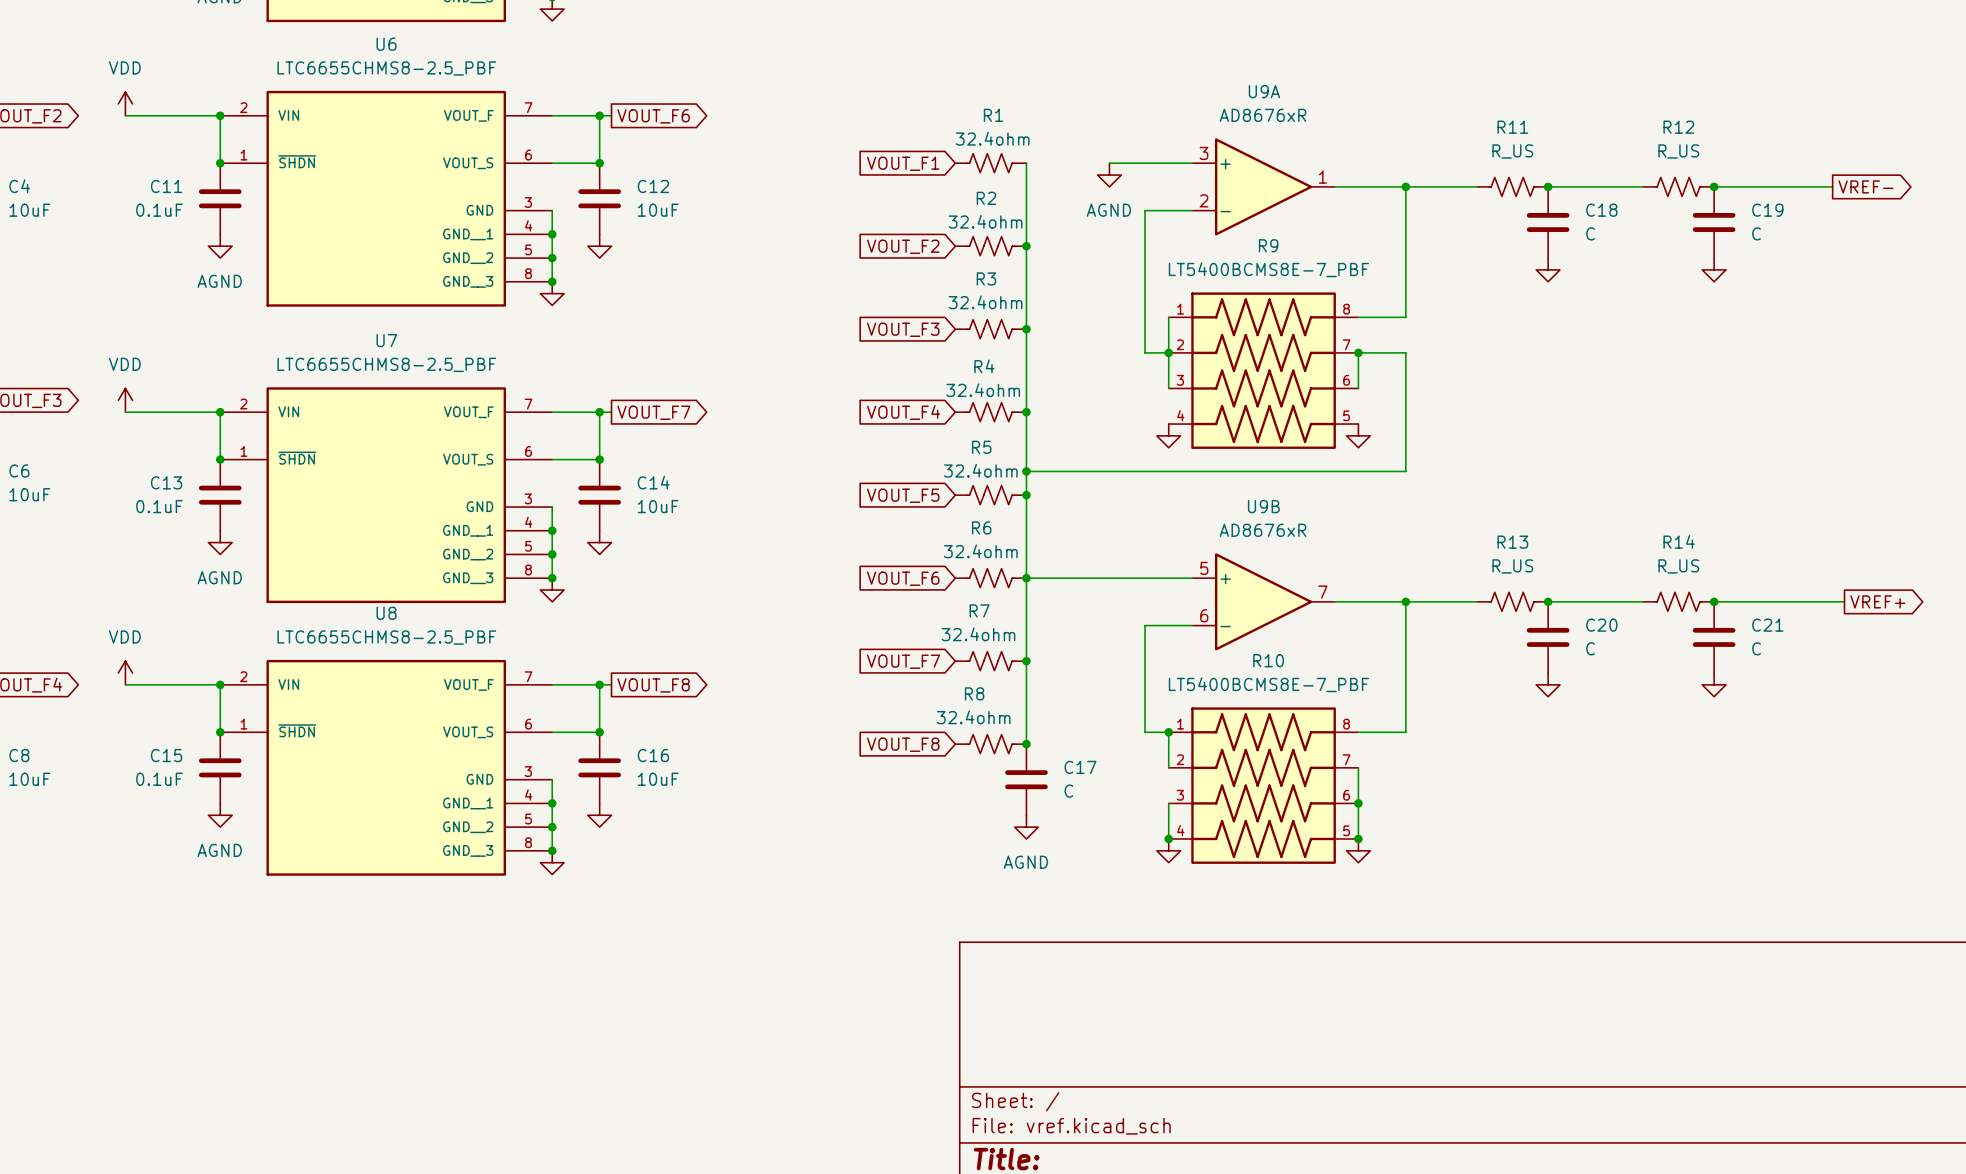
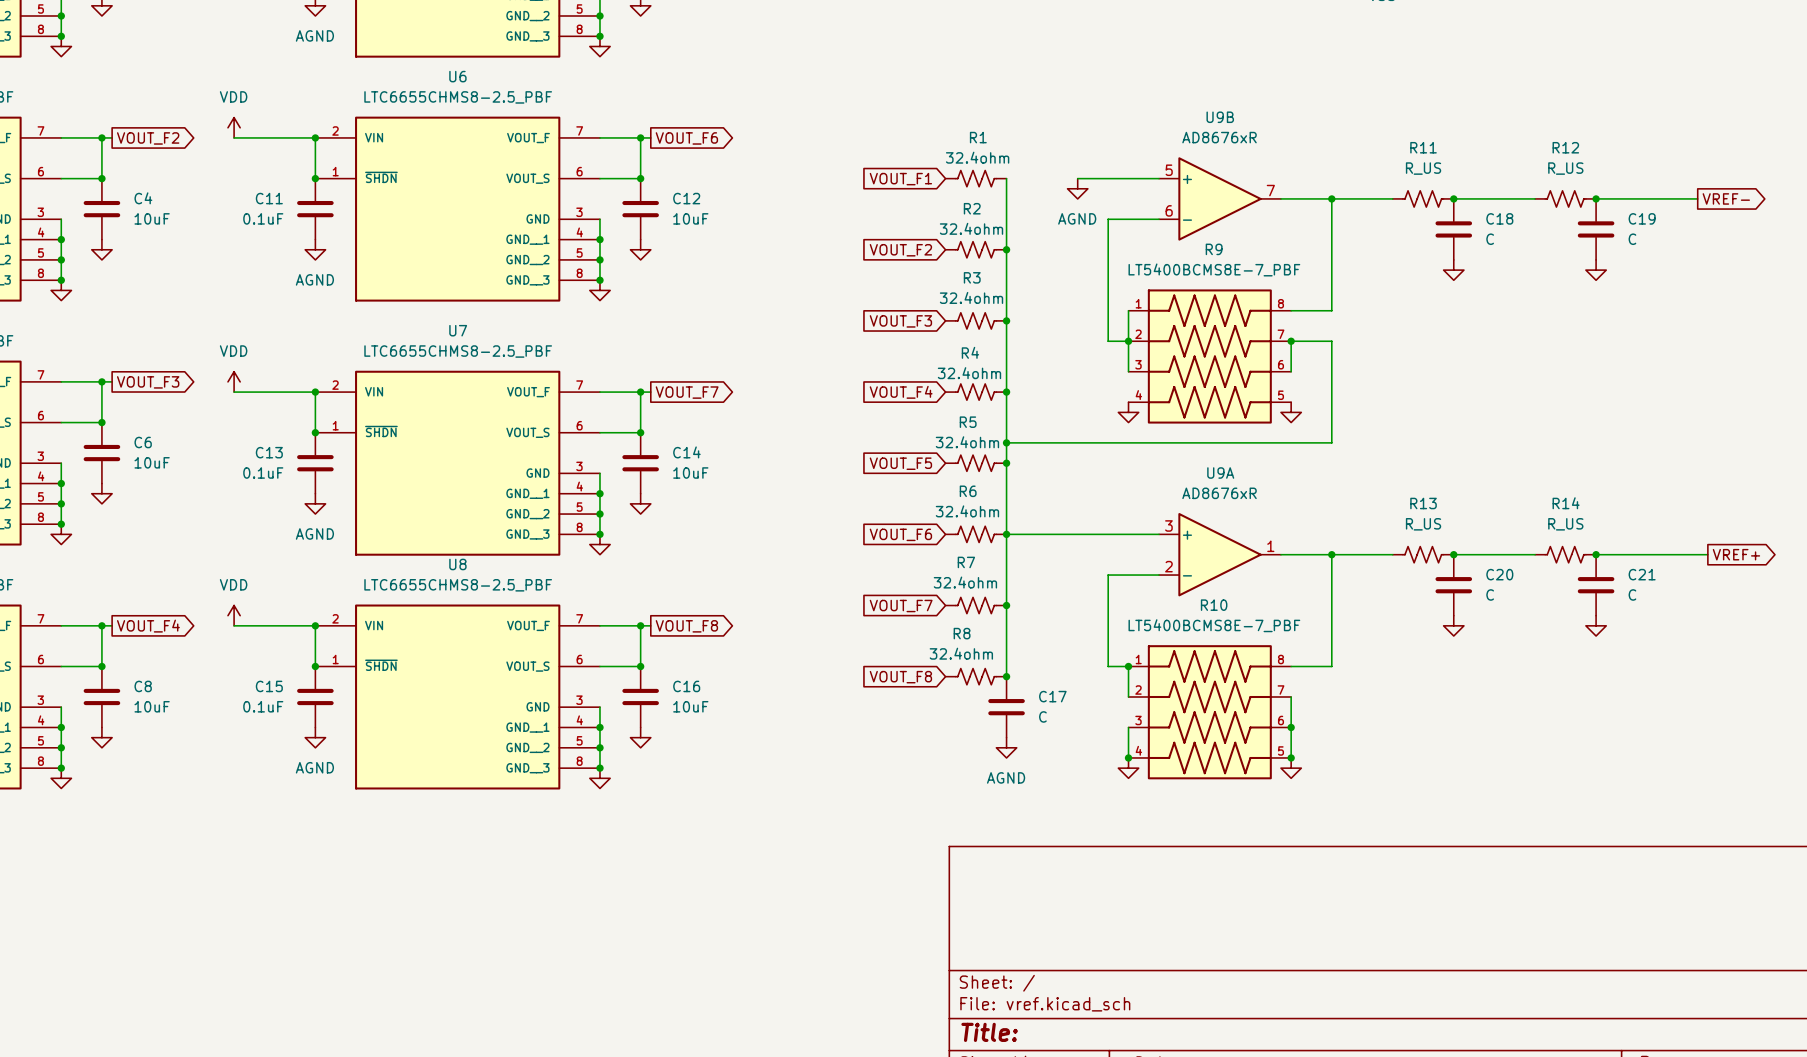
U9A position: (1263, 186) -> (1220, 554)
U9B position: (1263, 601) -> (1220, 198)

